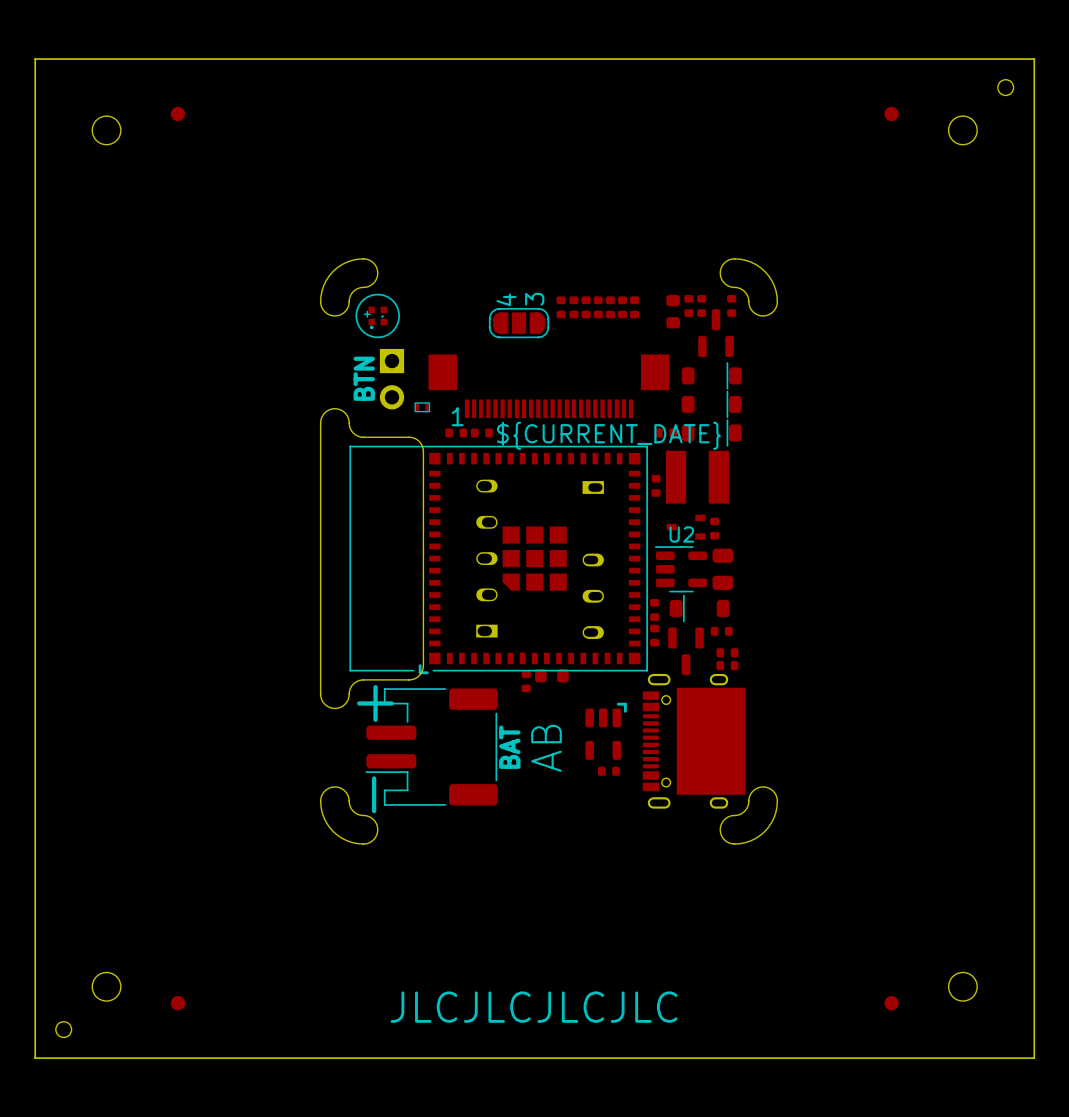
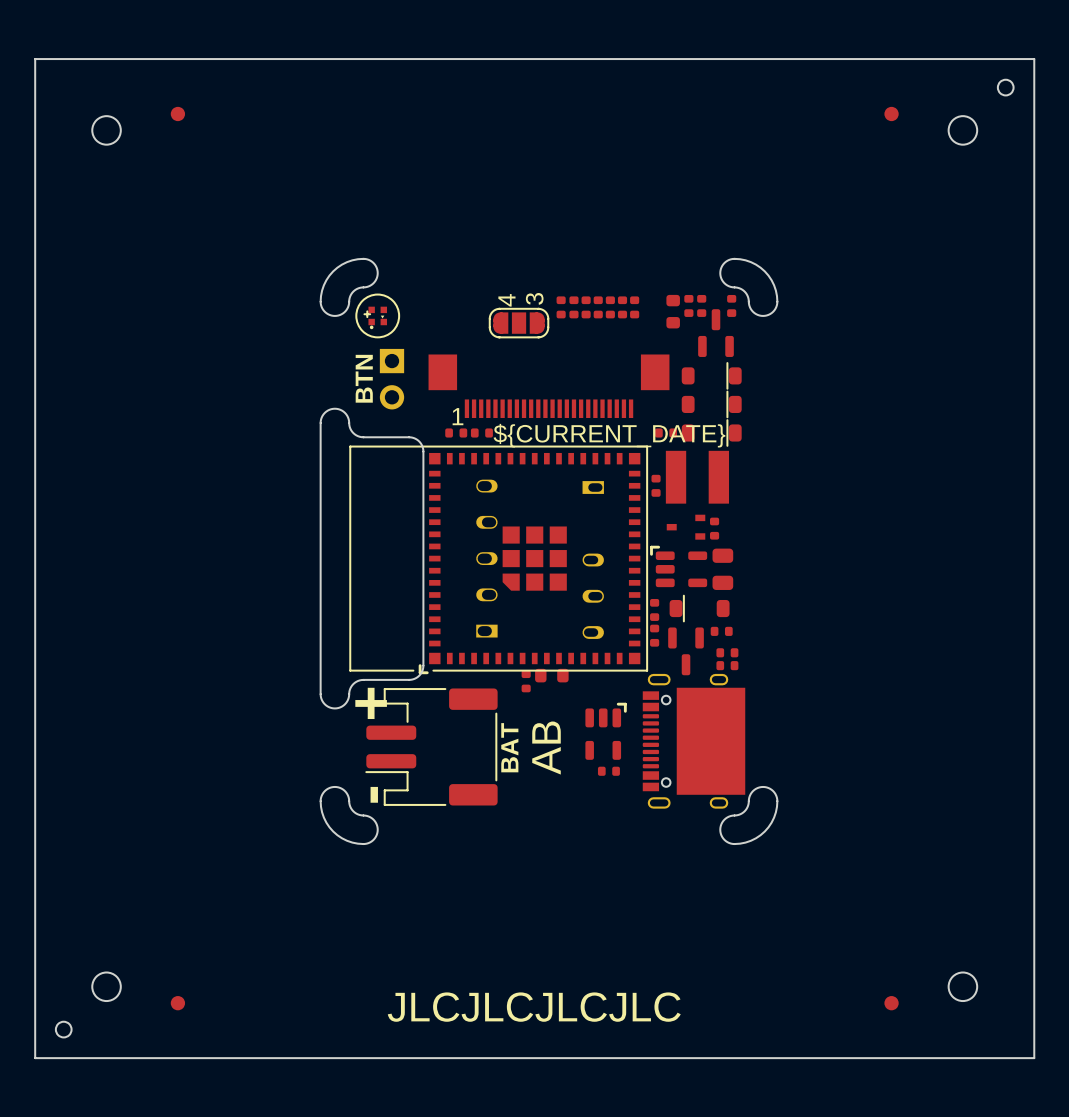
part: (422, 407) -> none
part: none -> (678, 566)
U2: (681, 569) -> none

